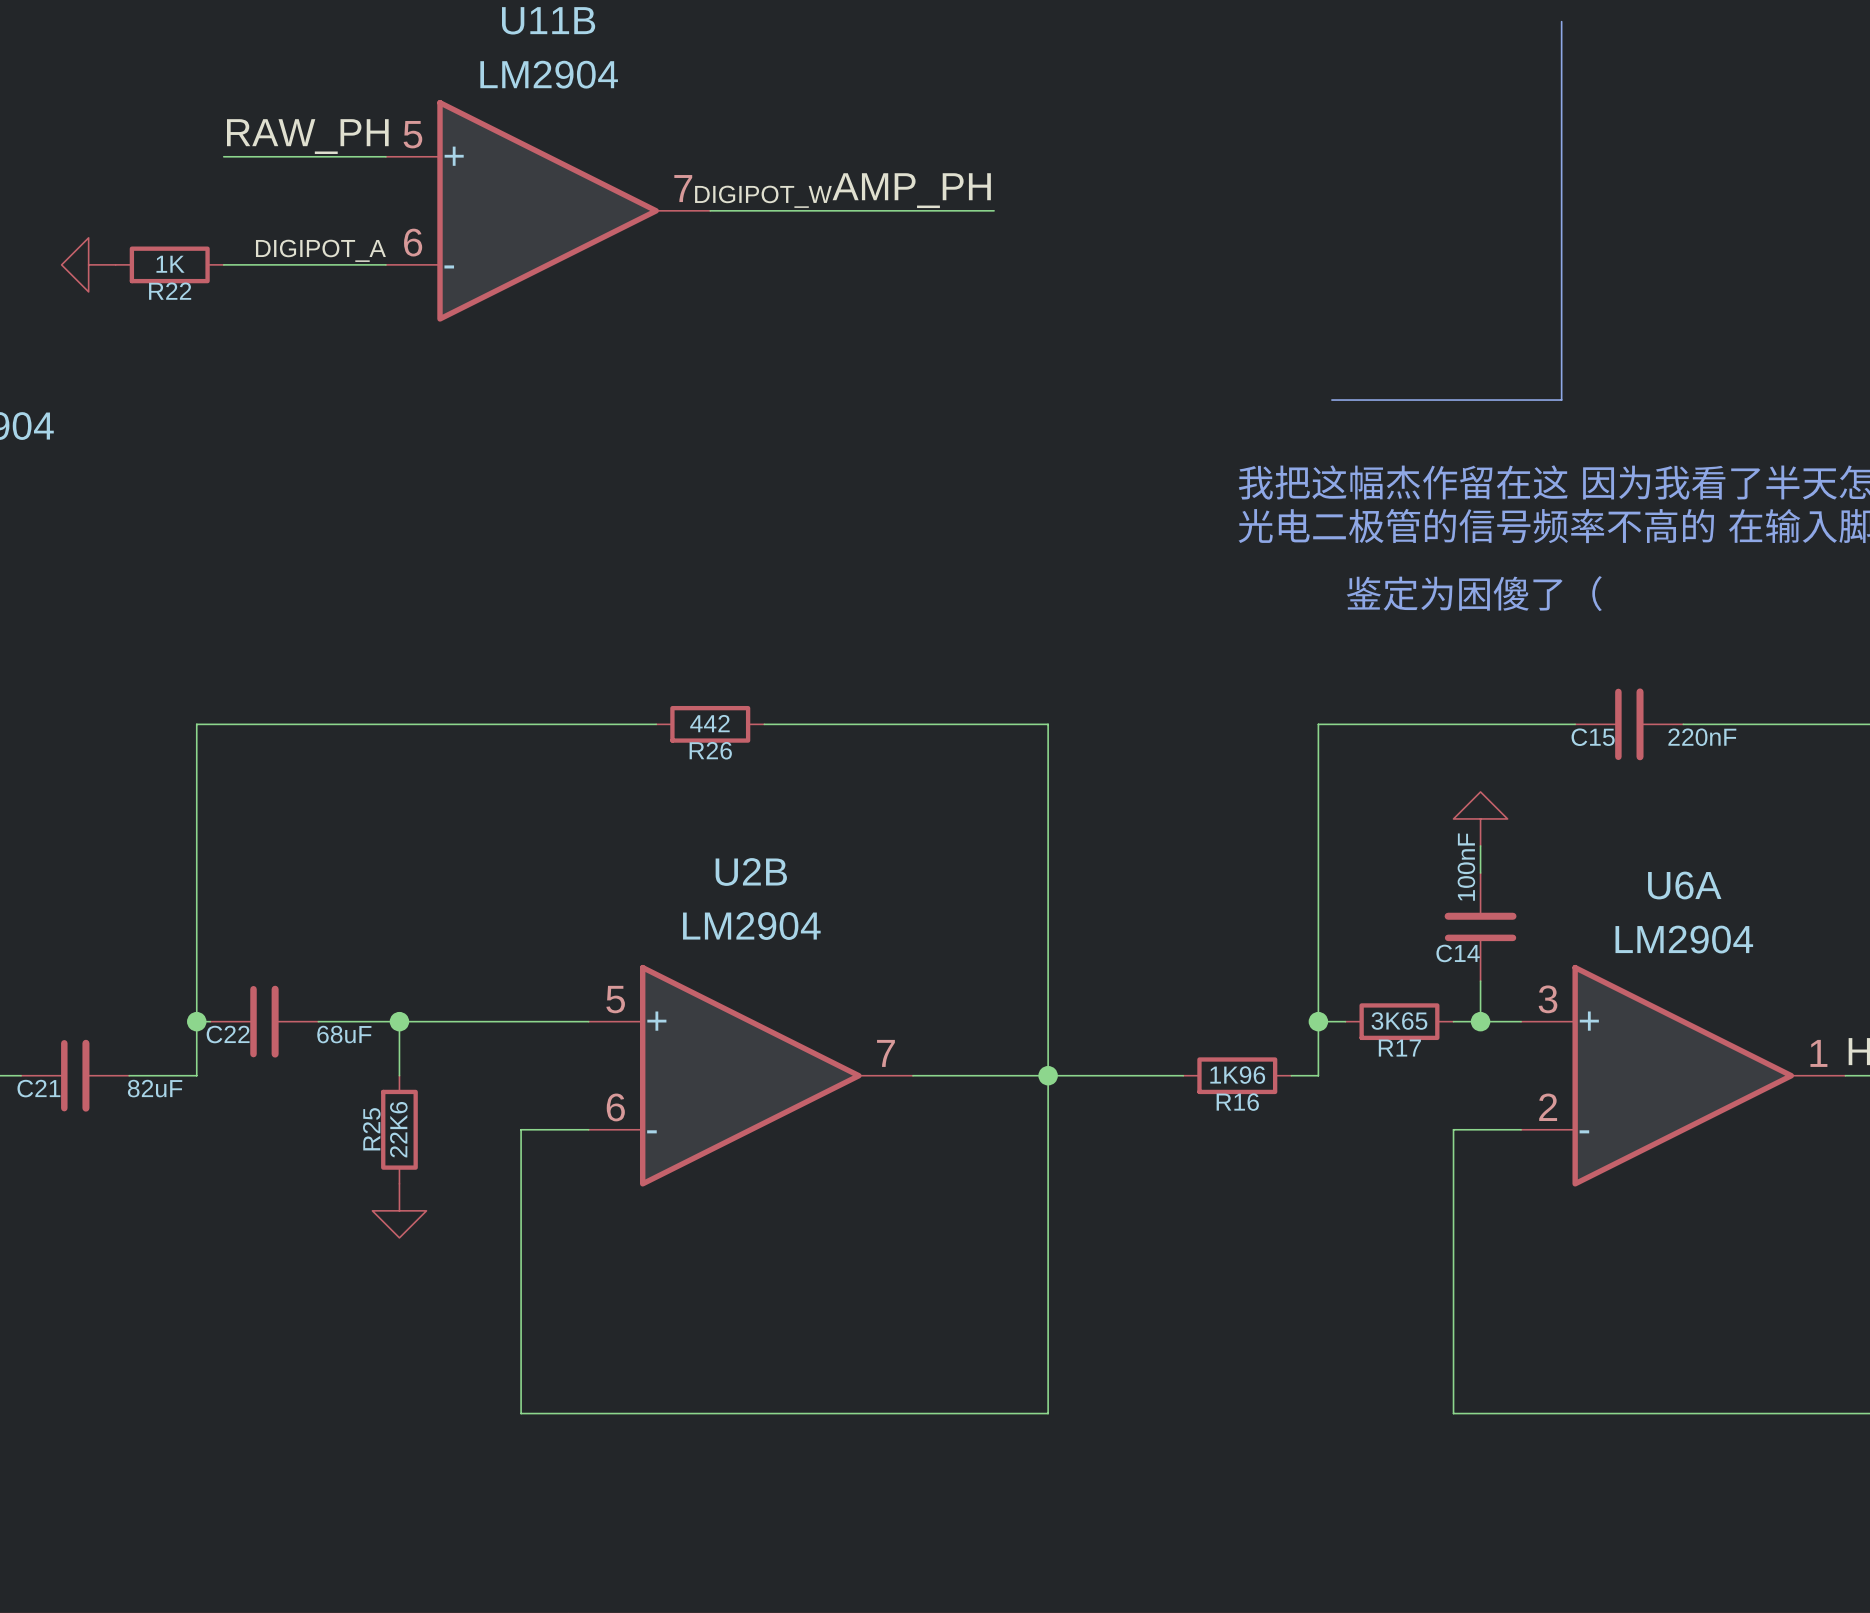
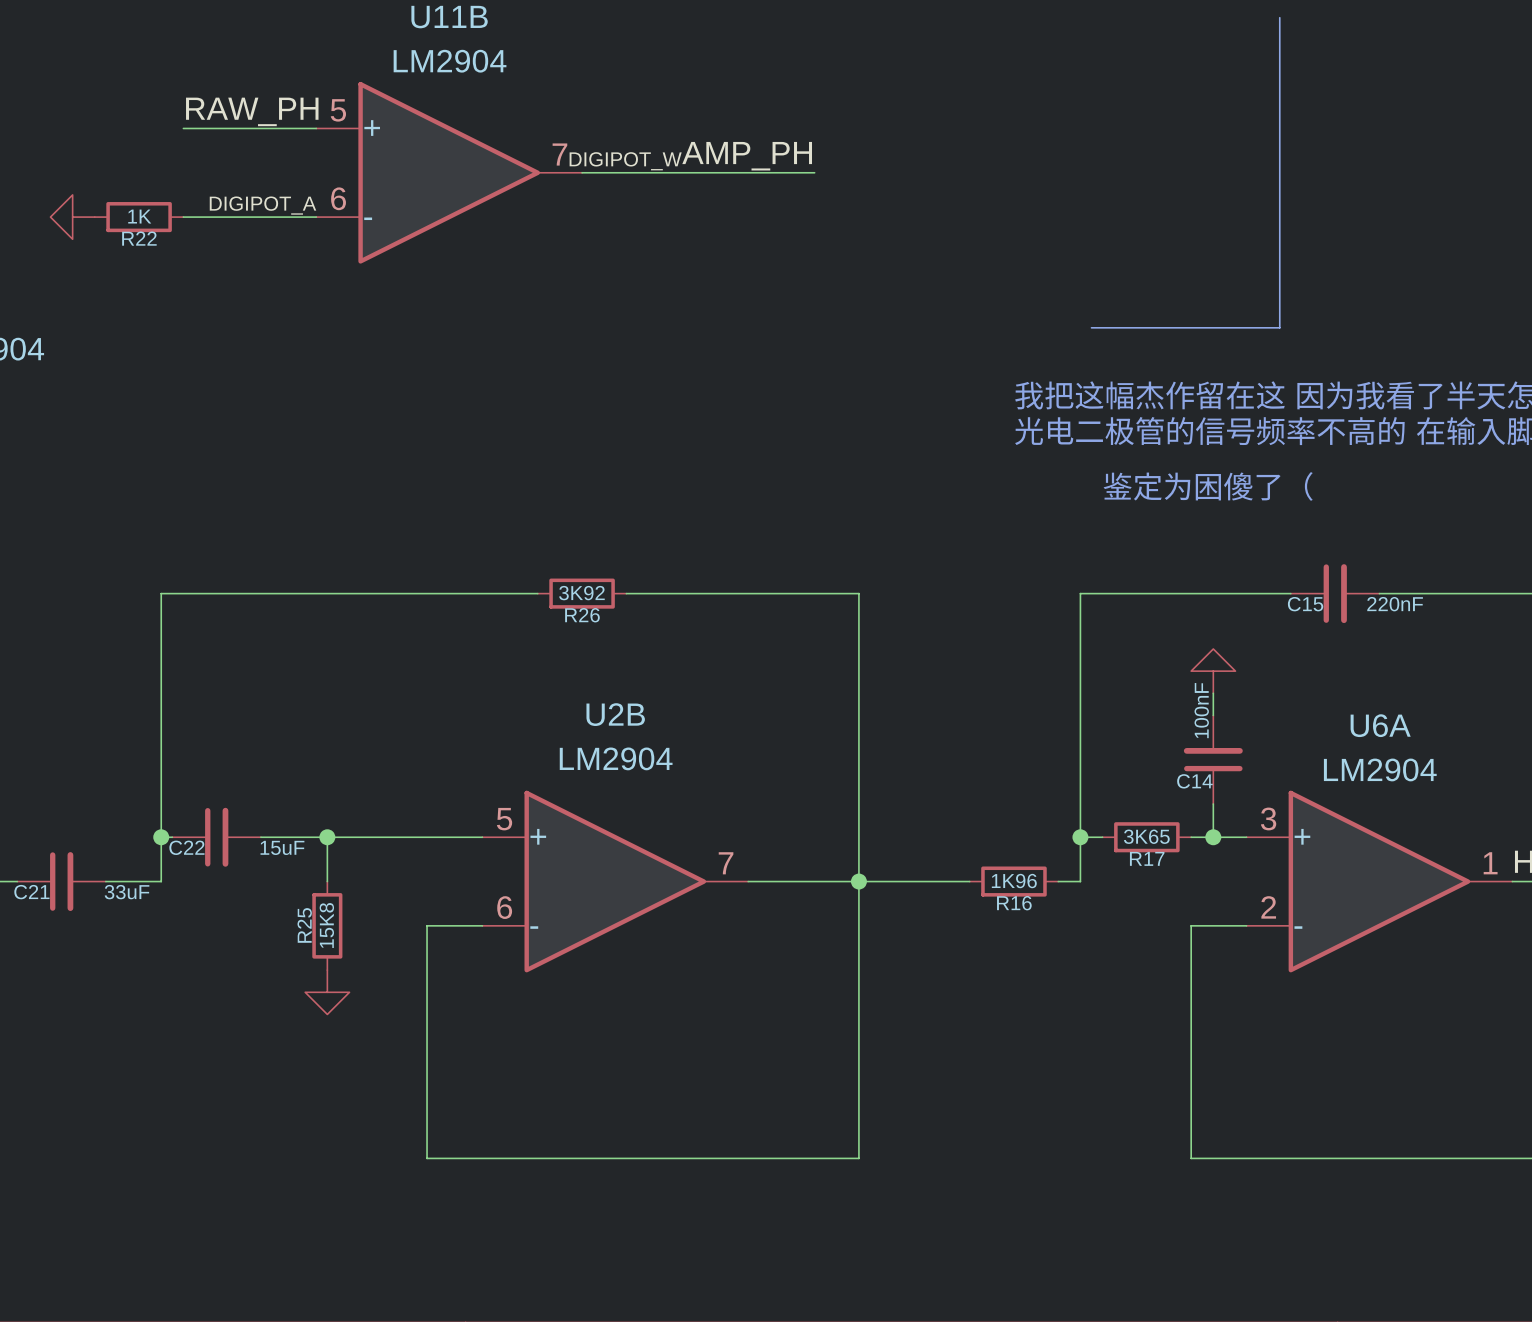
R26 value: 442 (709, 723) -> 3K92 (581, 593)
C22 value: 68uF (344, 1034) -> 15uF (282, 847)
C21 value: 82uF (155, 1088) -> 33uF (127, 892)
R25 value: 22K6 (398, 1129) -> 15K8 (326, 925)

